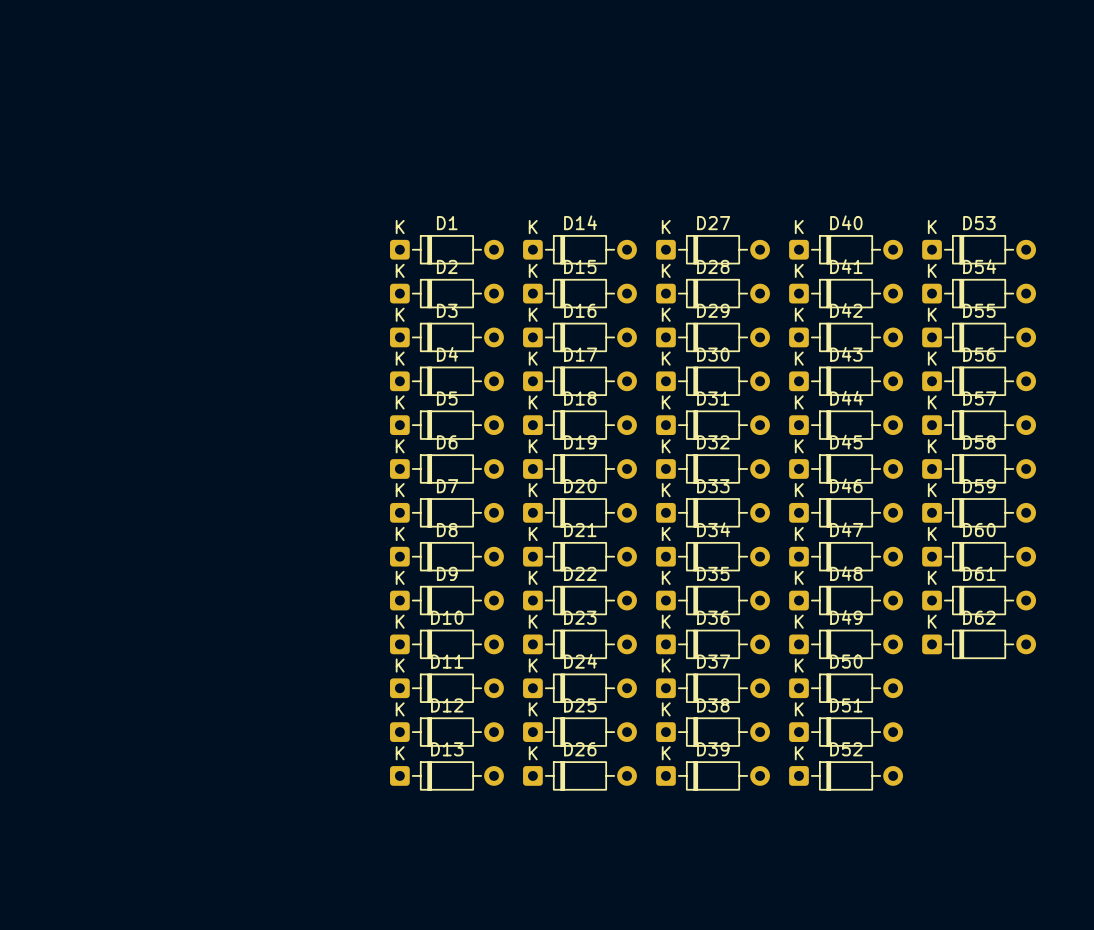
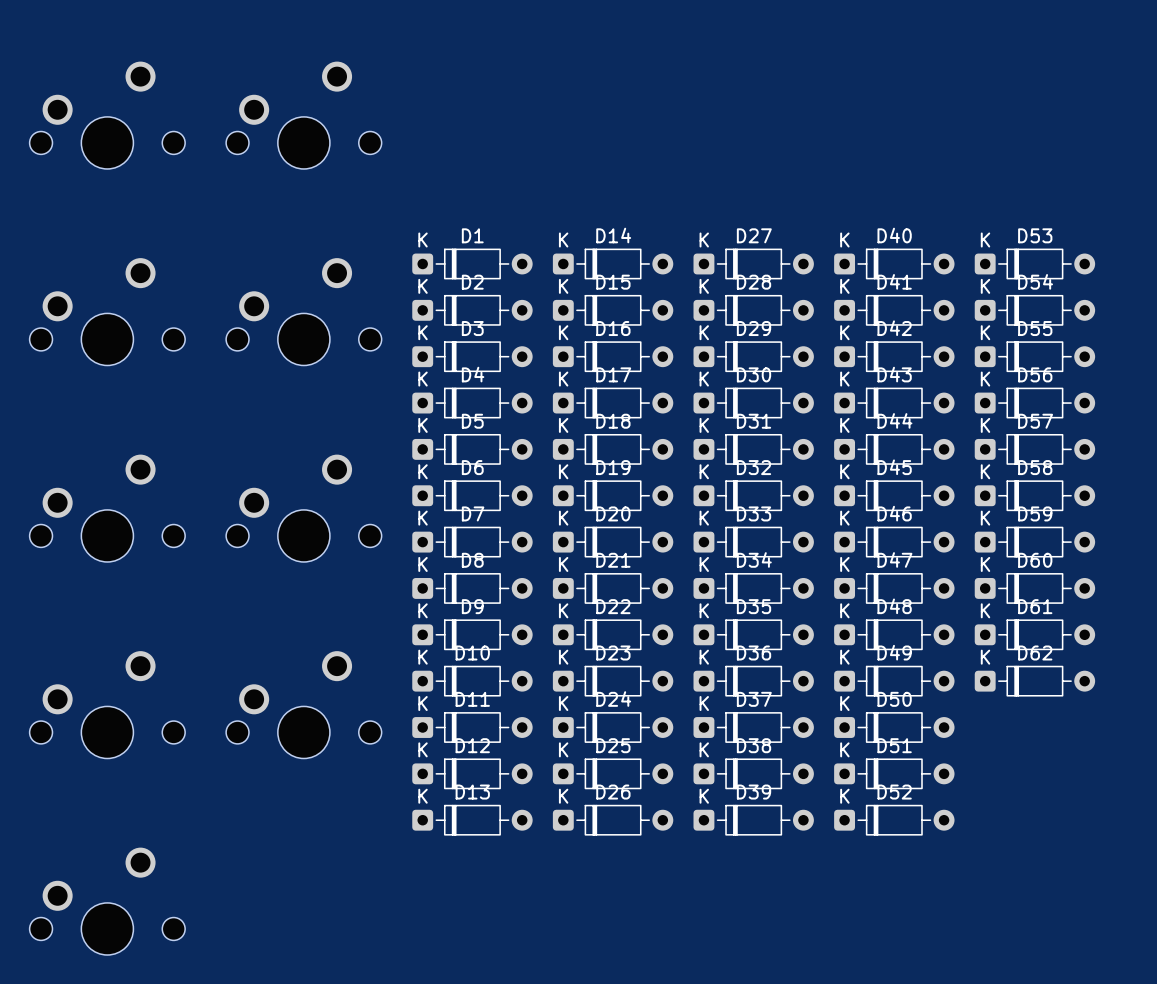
part: none -> (107, 115)
part: none -> (303, 115)
part: none -> (107, 311)
part: none -> (303, 311)
part: none -> (107, 508)
part: none -> (303, 508)
part: none -> (107, 704)
part: none -> (303, 704)
part: none -> (107, 901)

